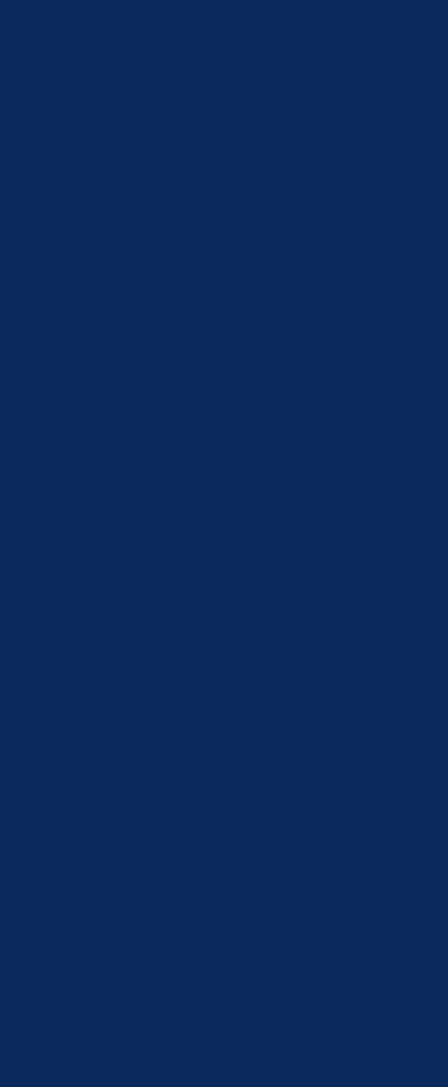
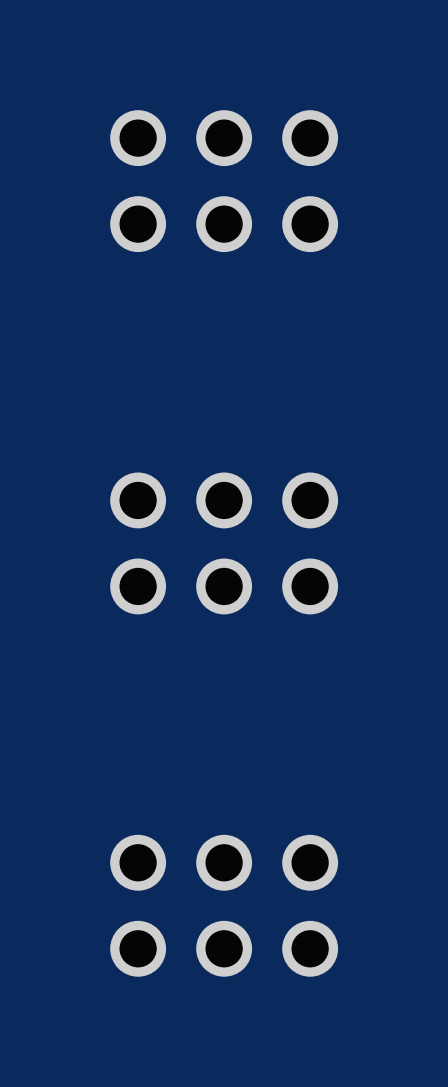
part: none -> (224, 181)
part: none -> (224, 543)
part: none -> (224, 905)

